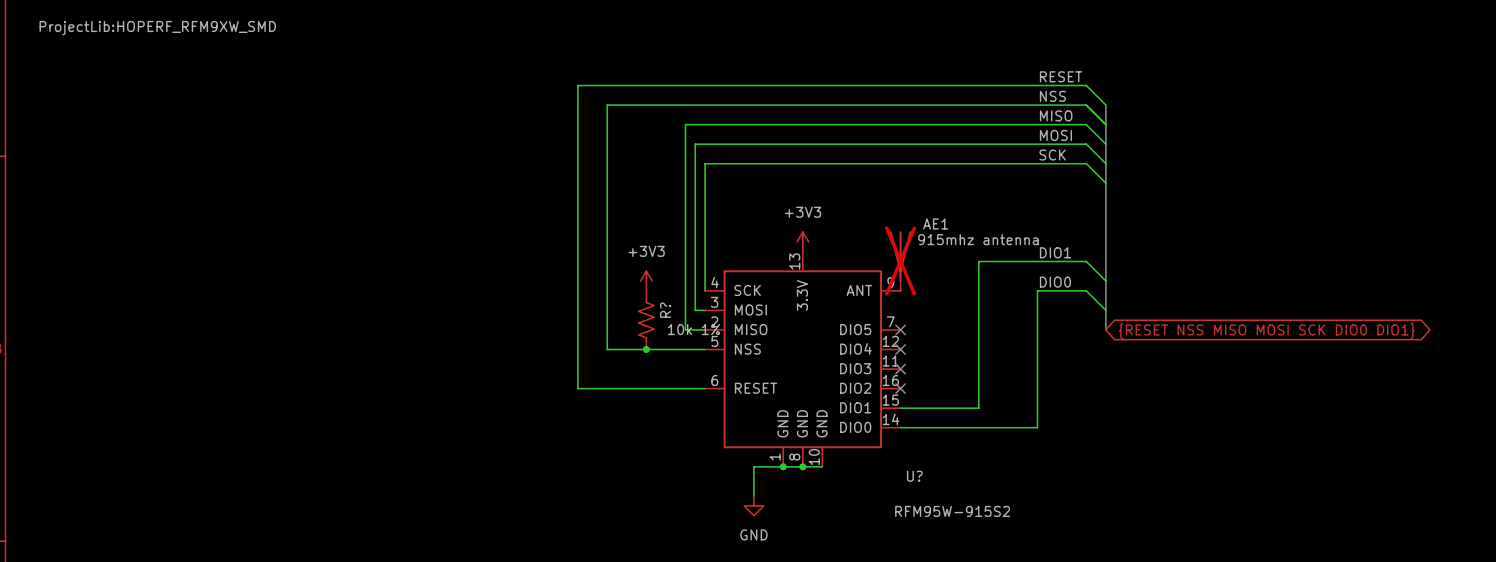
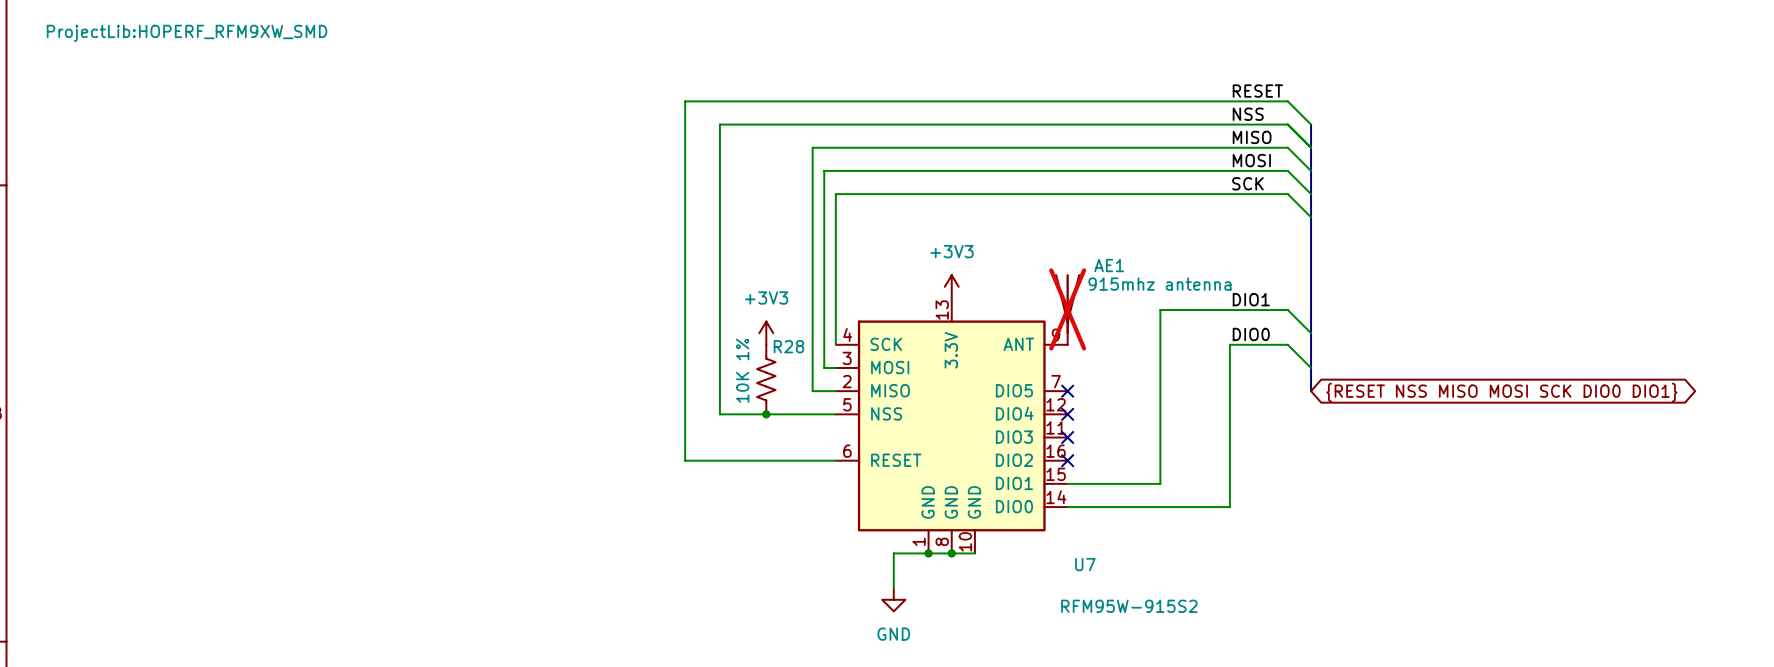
R? name: R? (665, 310) -> R28 (788, 346)
R? value: 10k 1% (693, 329) -> 10K 1% (742, 370)
U? name: U? (914, 476) -> U7 (1085, 564)

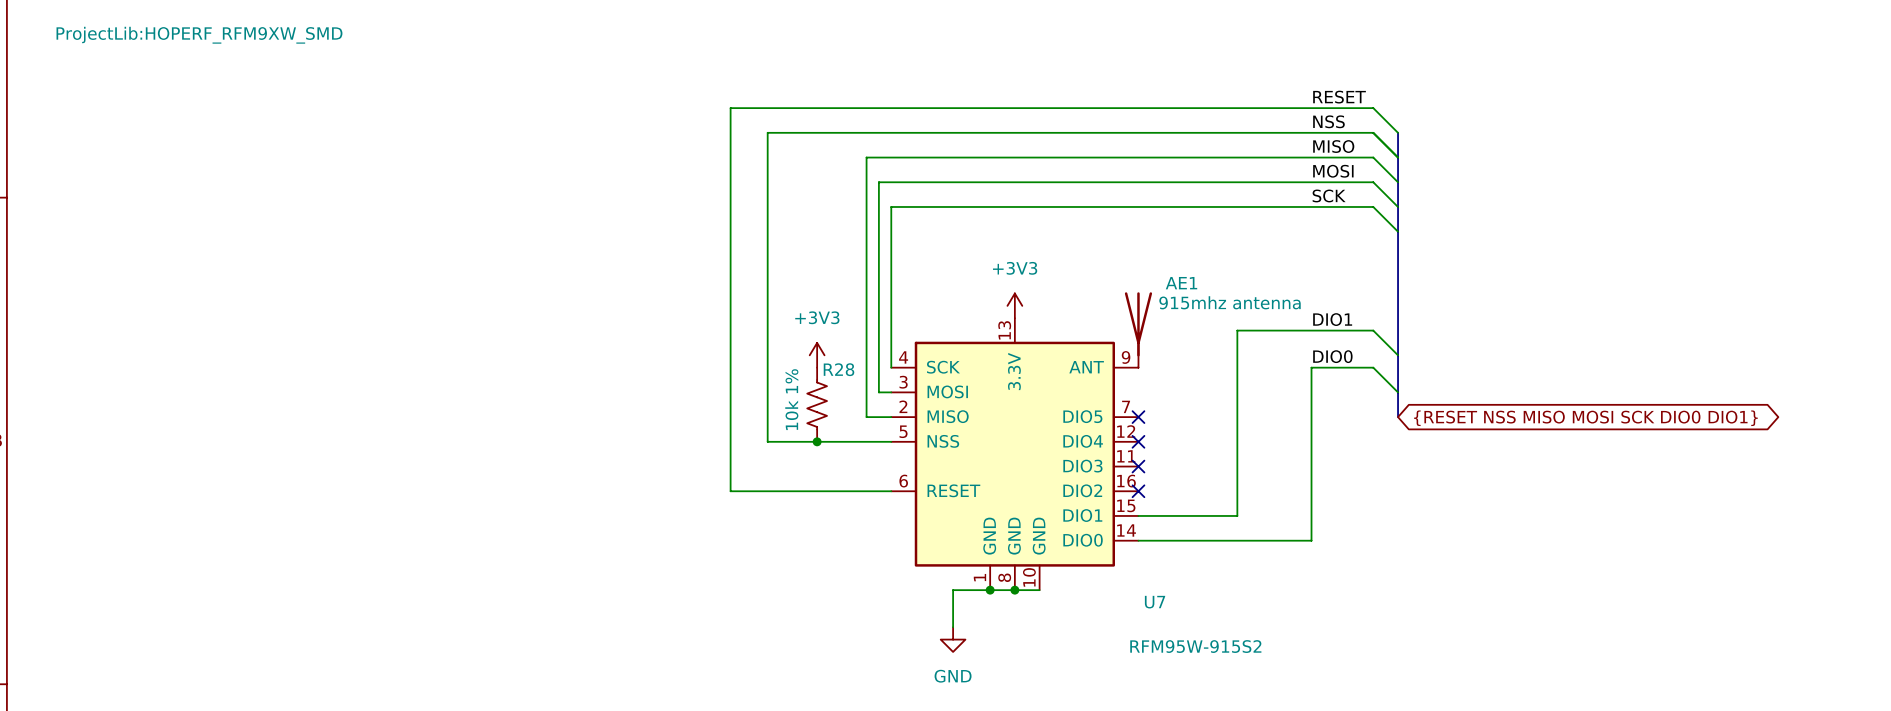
AE1 do-not-place cross: (1067, 309) -> none
R28 value: 10K 1% (742, 370) -> 10k 1% (791, 399)

